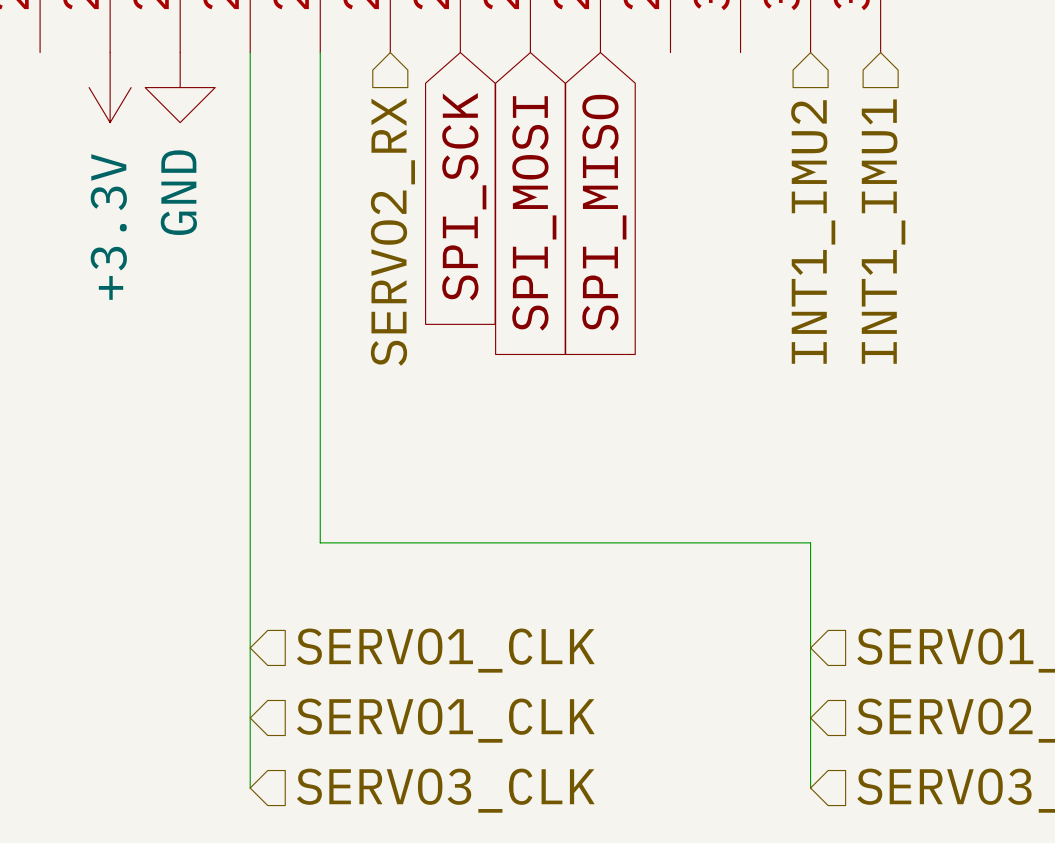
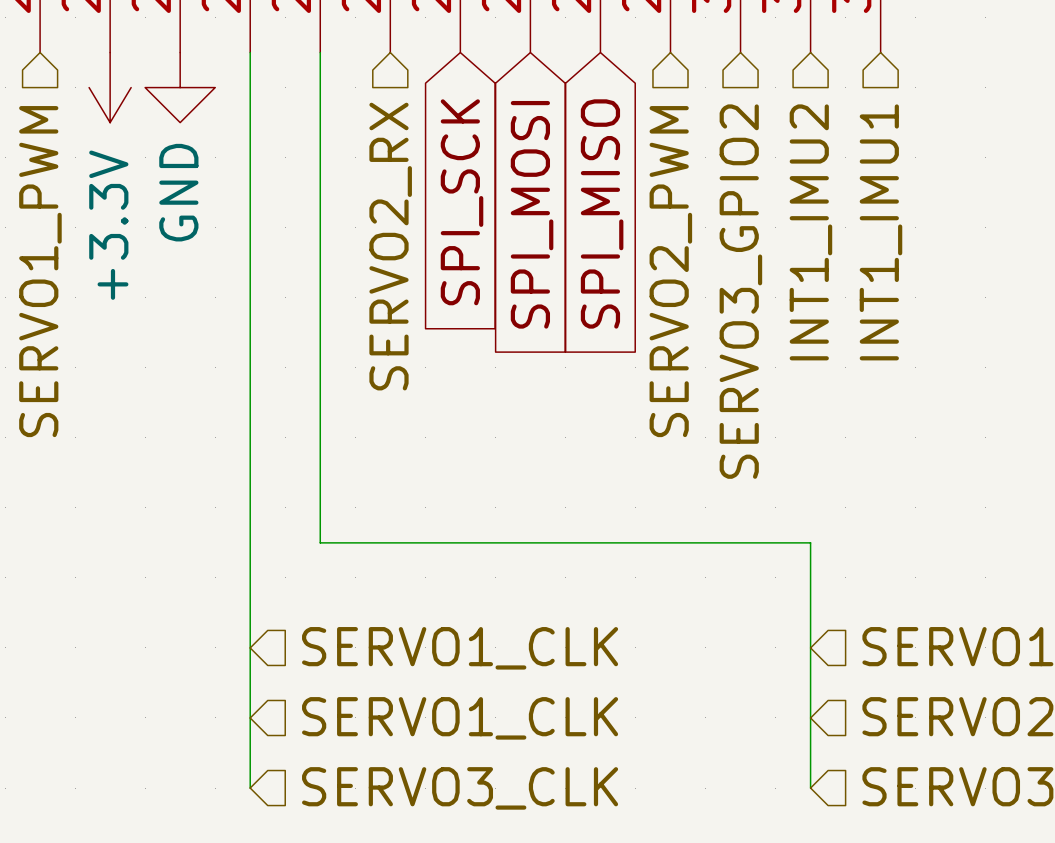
hierarchical label: none -> SERVO1_PWM (40, 271)
hierarchical label: none -> SERVO2_PWM (670, 271)
hierarchical label: none -> SERVO3_GPIO2 (740, 291)

